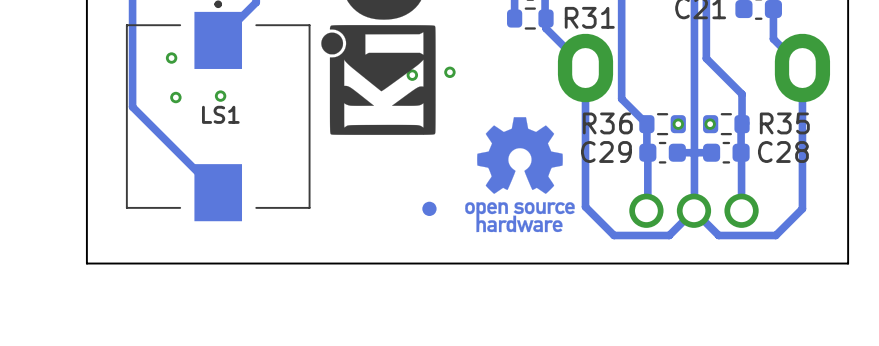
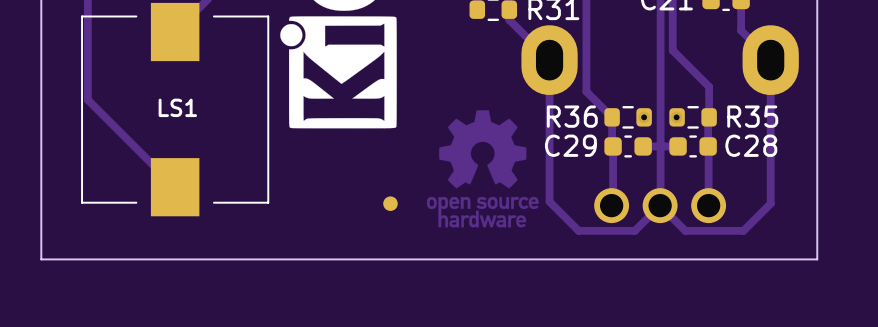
via: (171, 58) -> none
via: (449, 72) -> none
via: (412, 75) -> none
via: (220, 96) -> none
via: (175, 97) -> none

